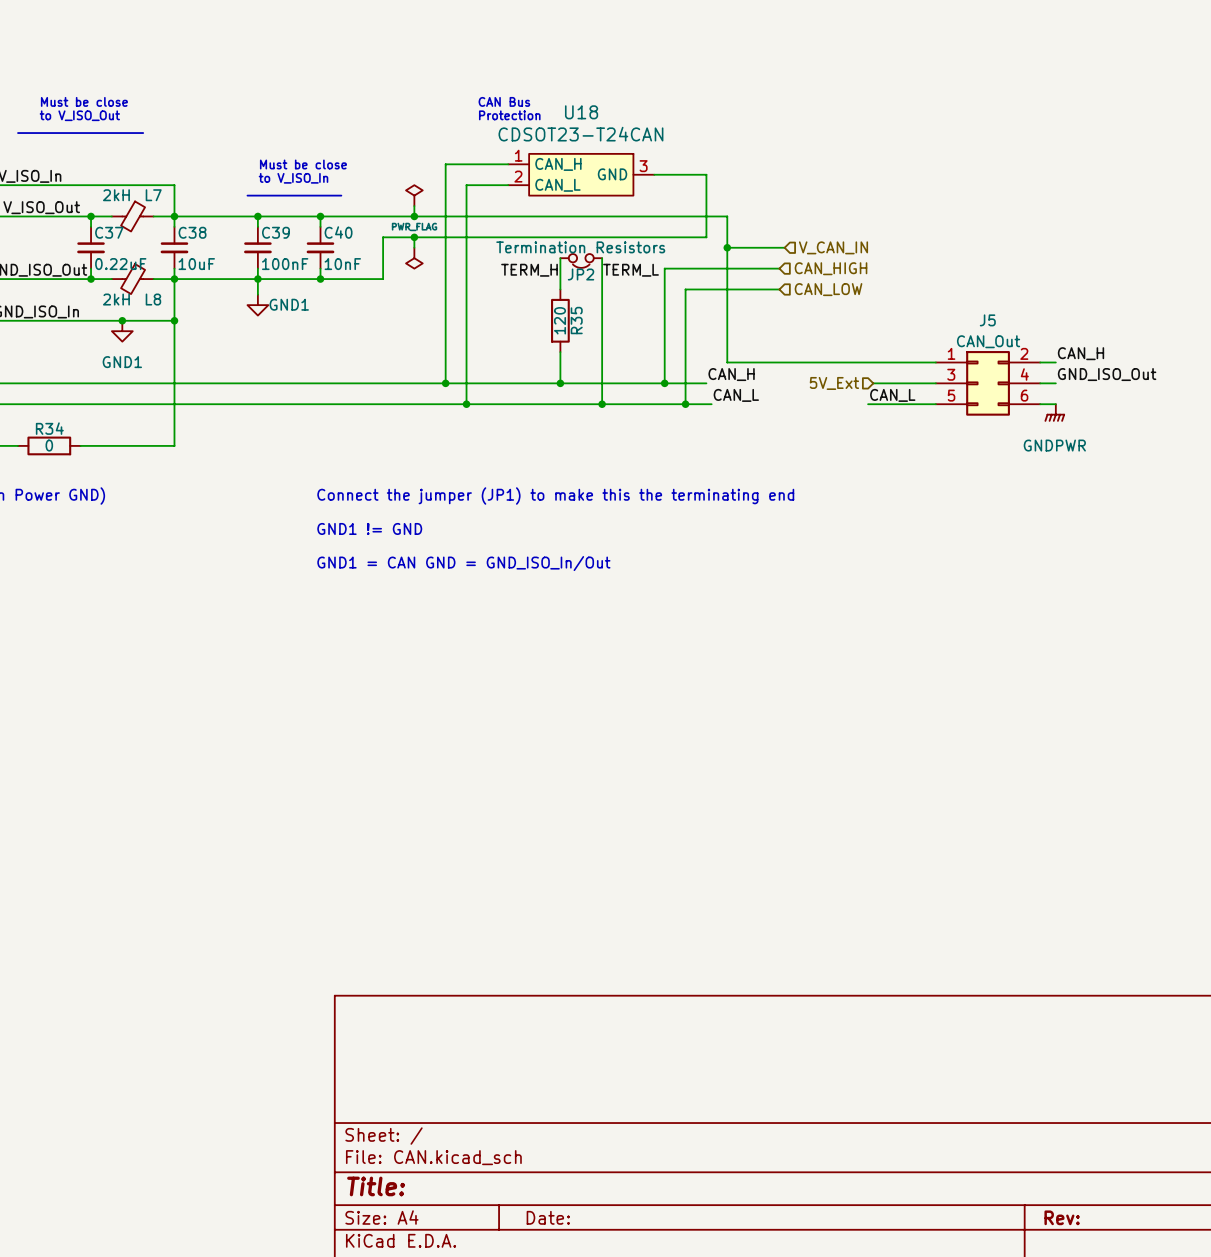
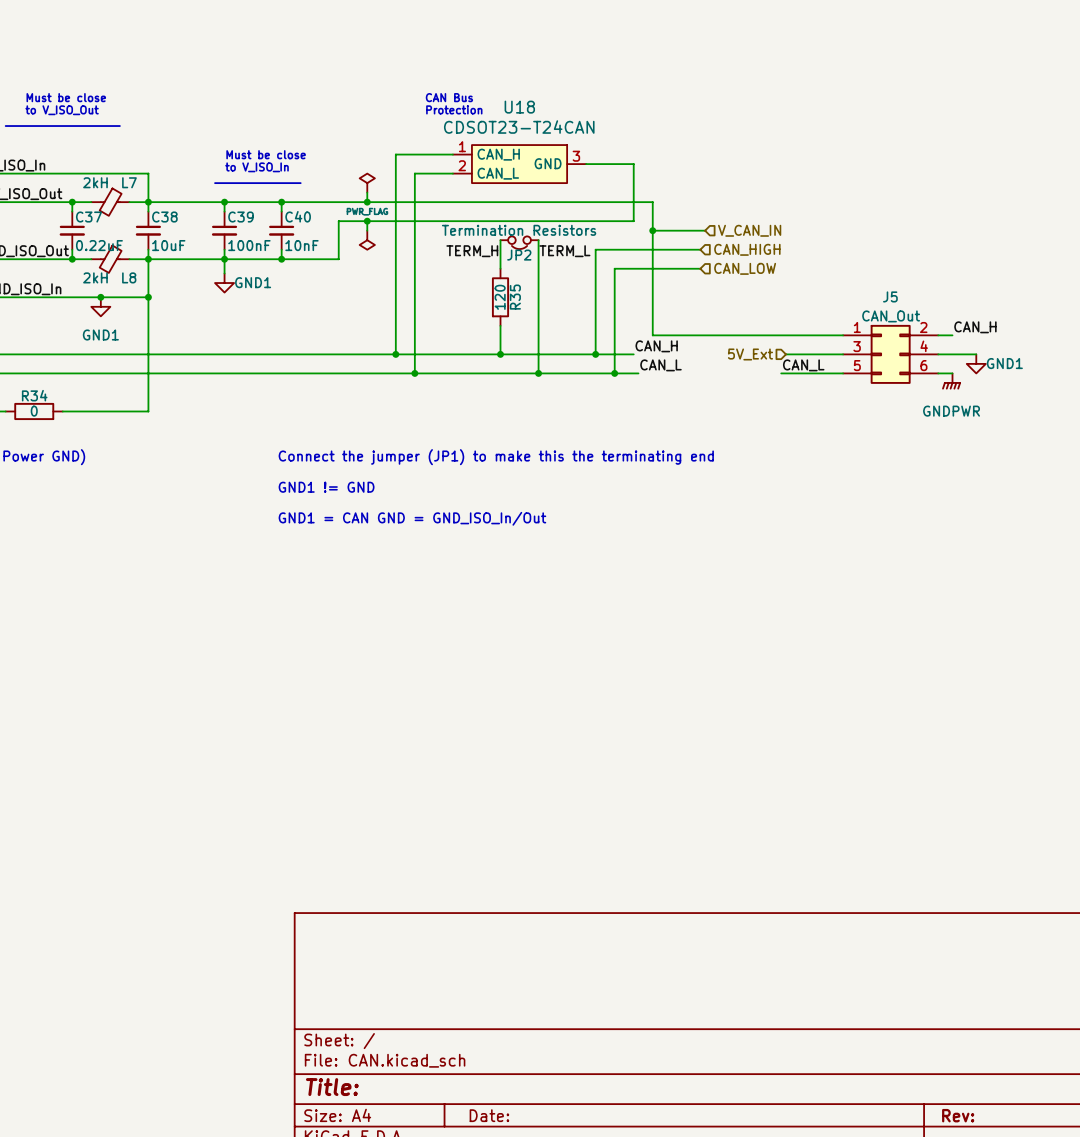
label: GND_ISO_Out (1107, 374) -> none
wire: none -> (952, 354) (976, 354)
power symbol: none -> GND1 (976, 363)

